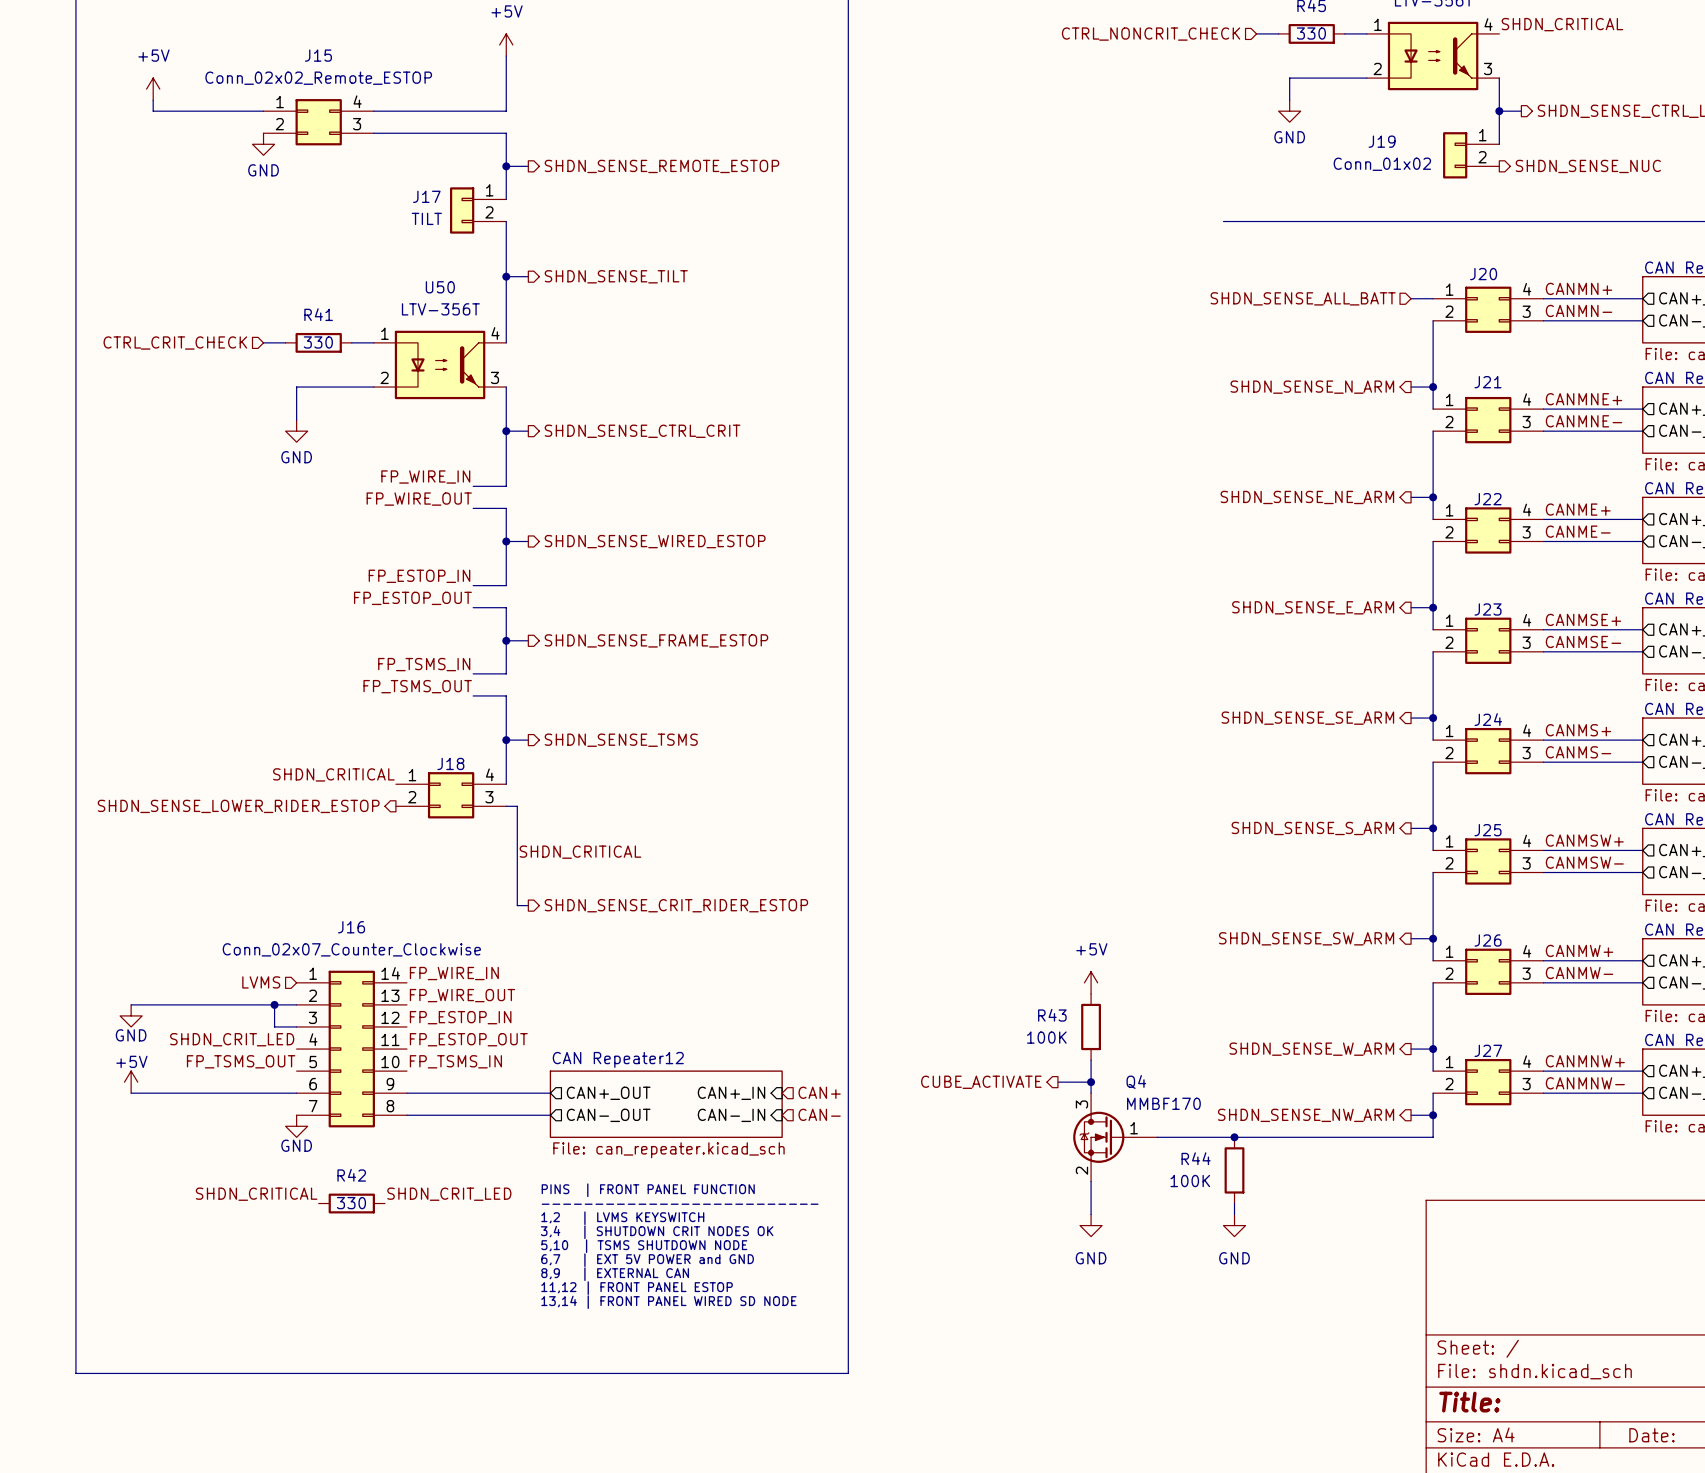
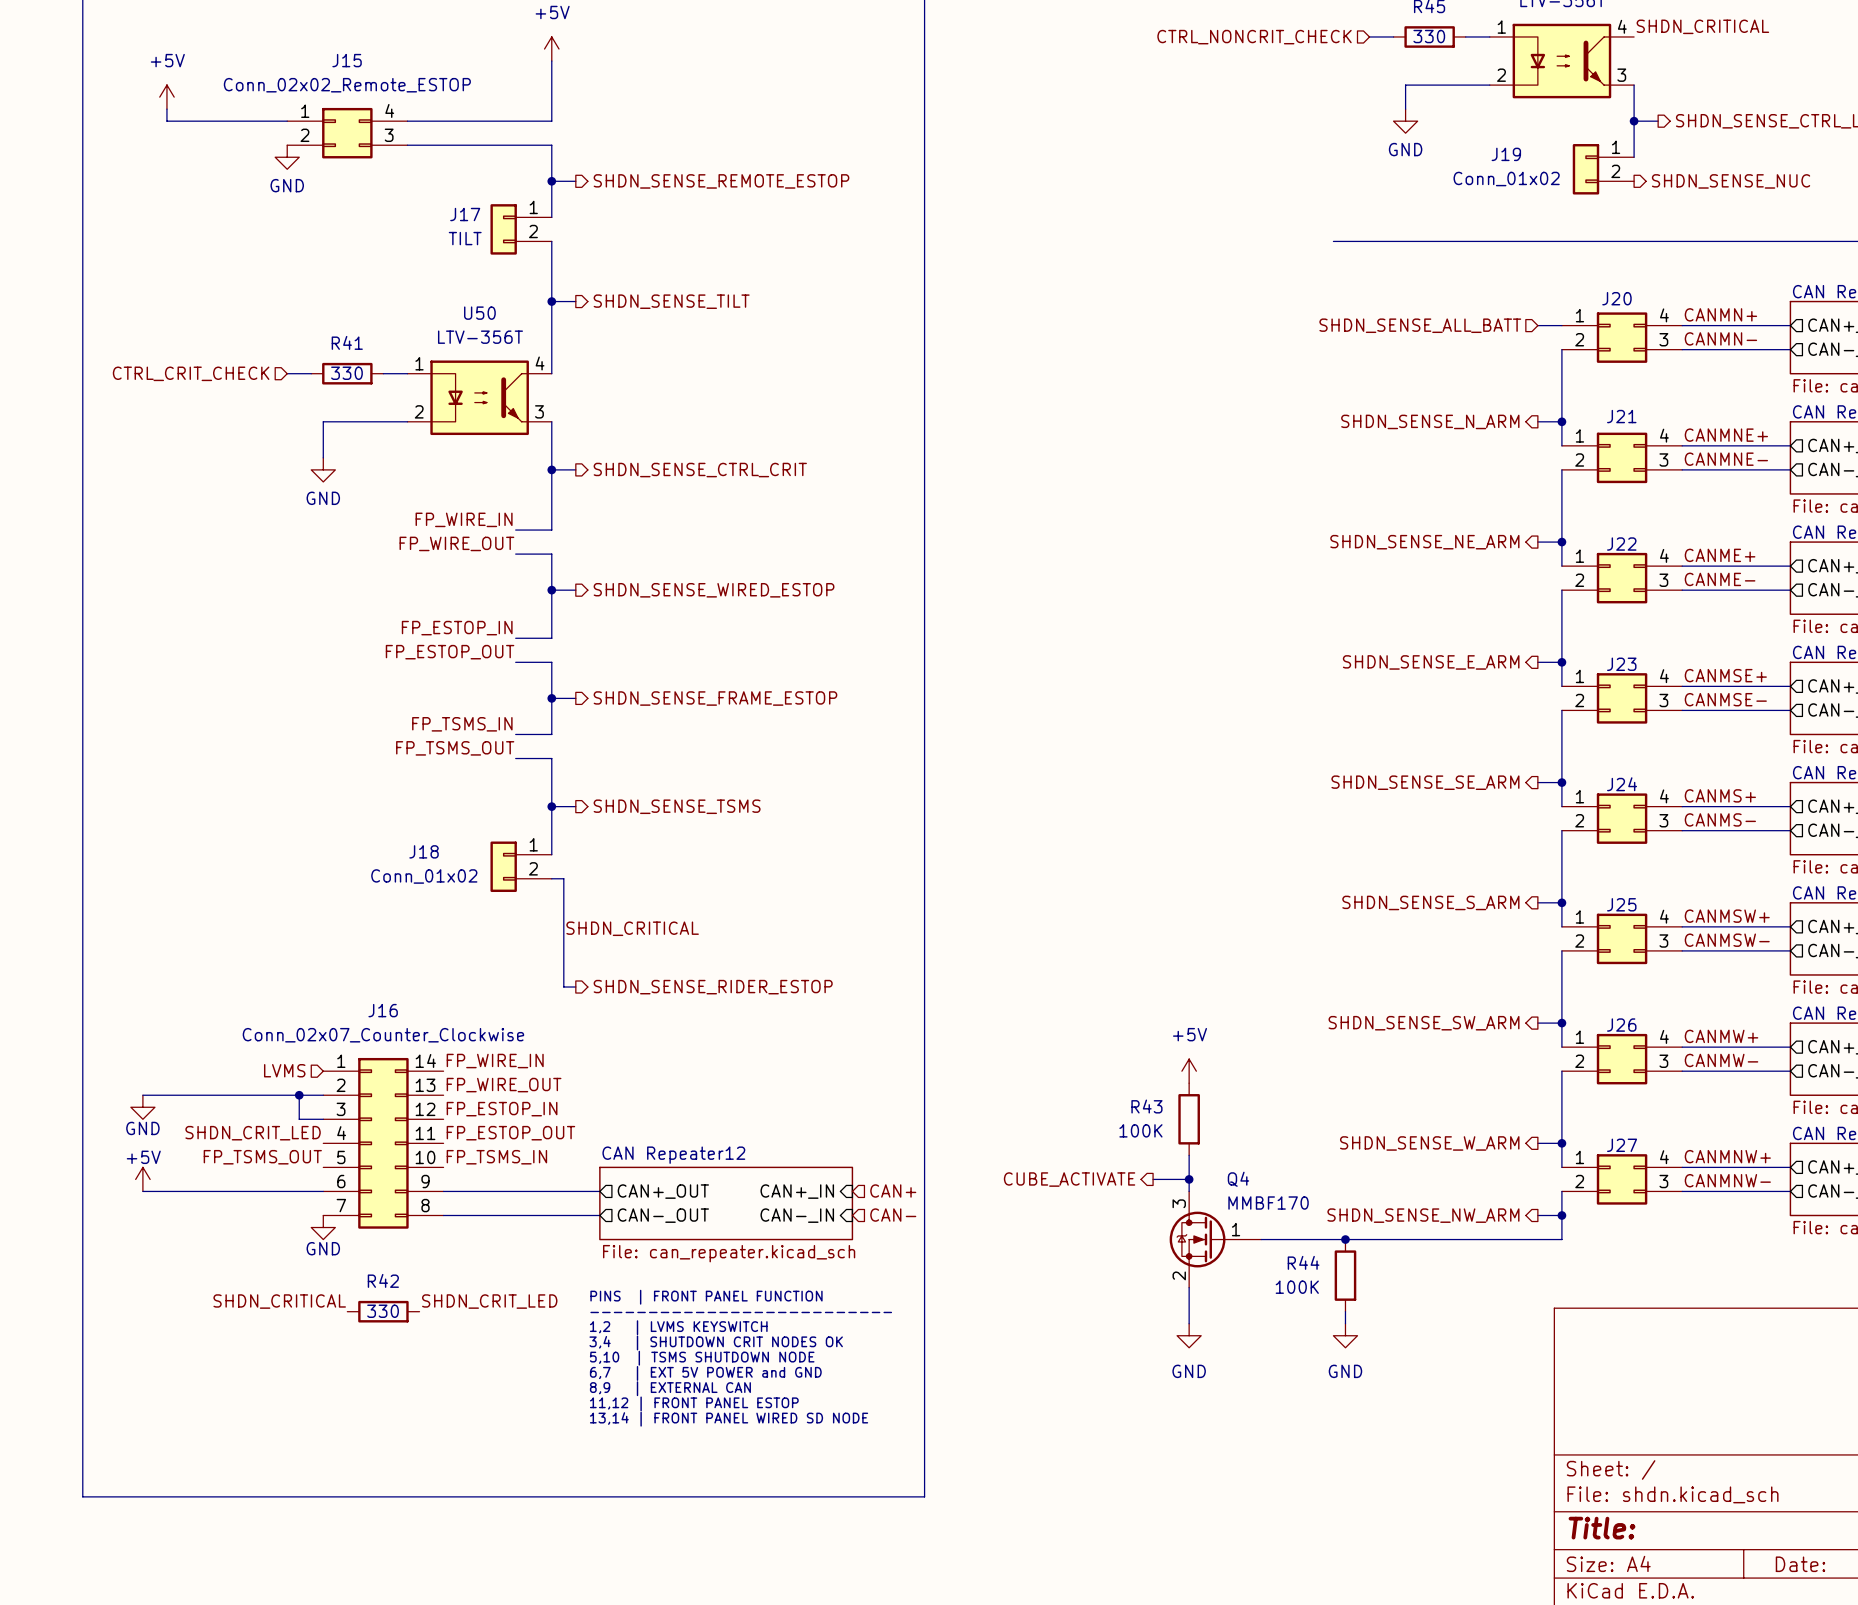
J18 name position: J18 (450, 763) -> J18 (424, 851)
J18 symbol: [395, 772, 507, 819] -> [490, 841, 552, 893]
label: SHDN_CRITICAL (333, 774) -> none
J18 value: none -> Conn_01x02 (424, 876)
hierarchical label: SHDN_SENSE_LOWER_RIDER_ESTOP (238, 806) -> none
hierarchical label: SHDN_SENSE_CRIT_RIDER_ESTOP (676, 905) -> SHDN_SENSE_RIDER_ESTOP (713, 987)

